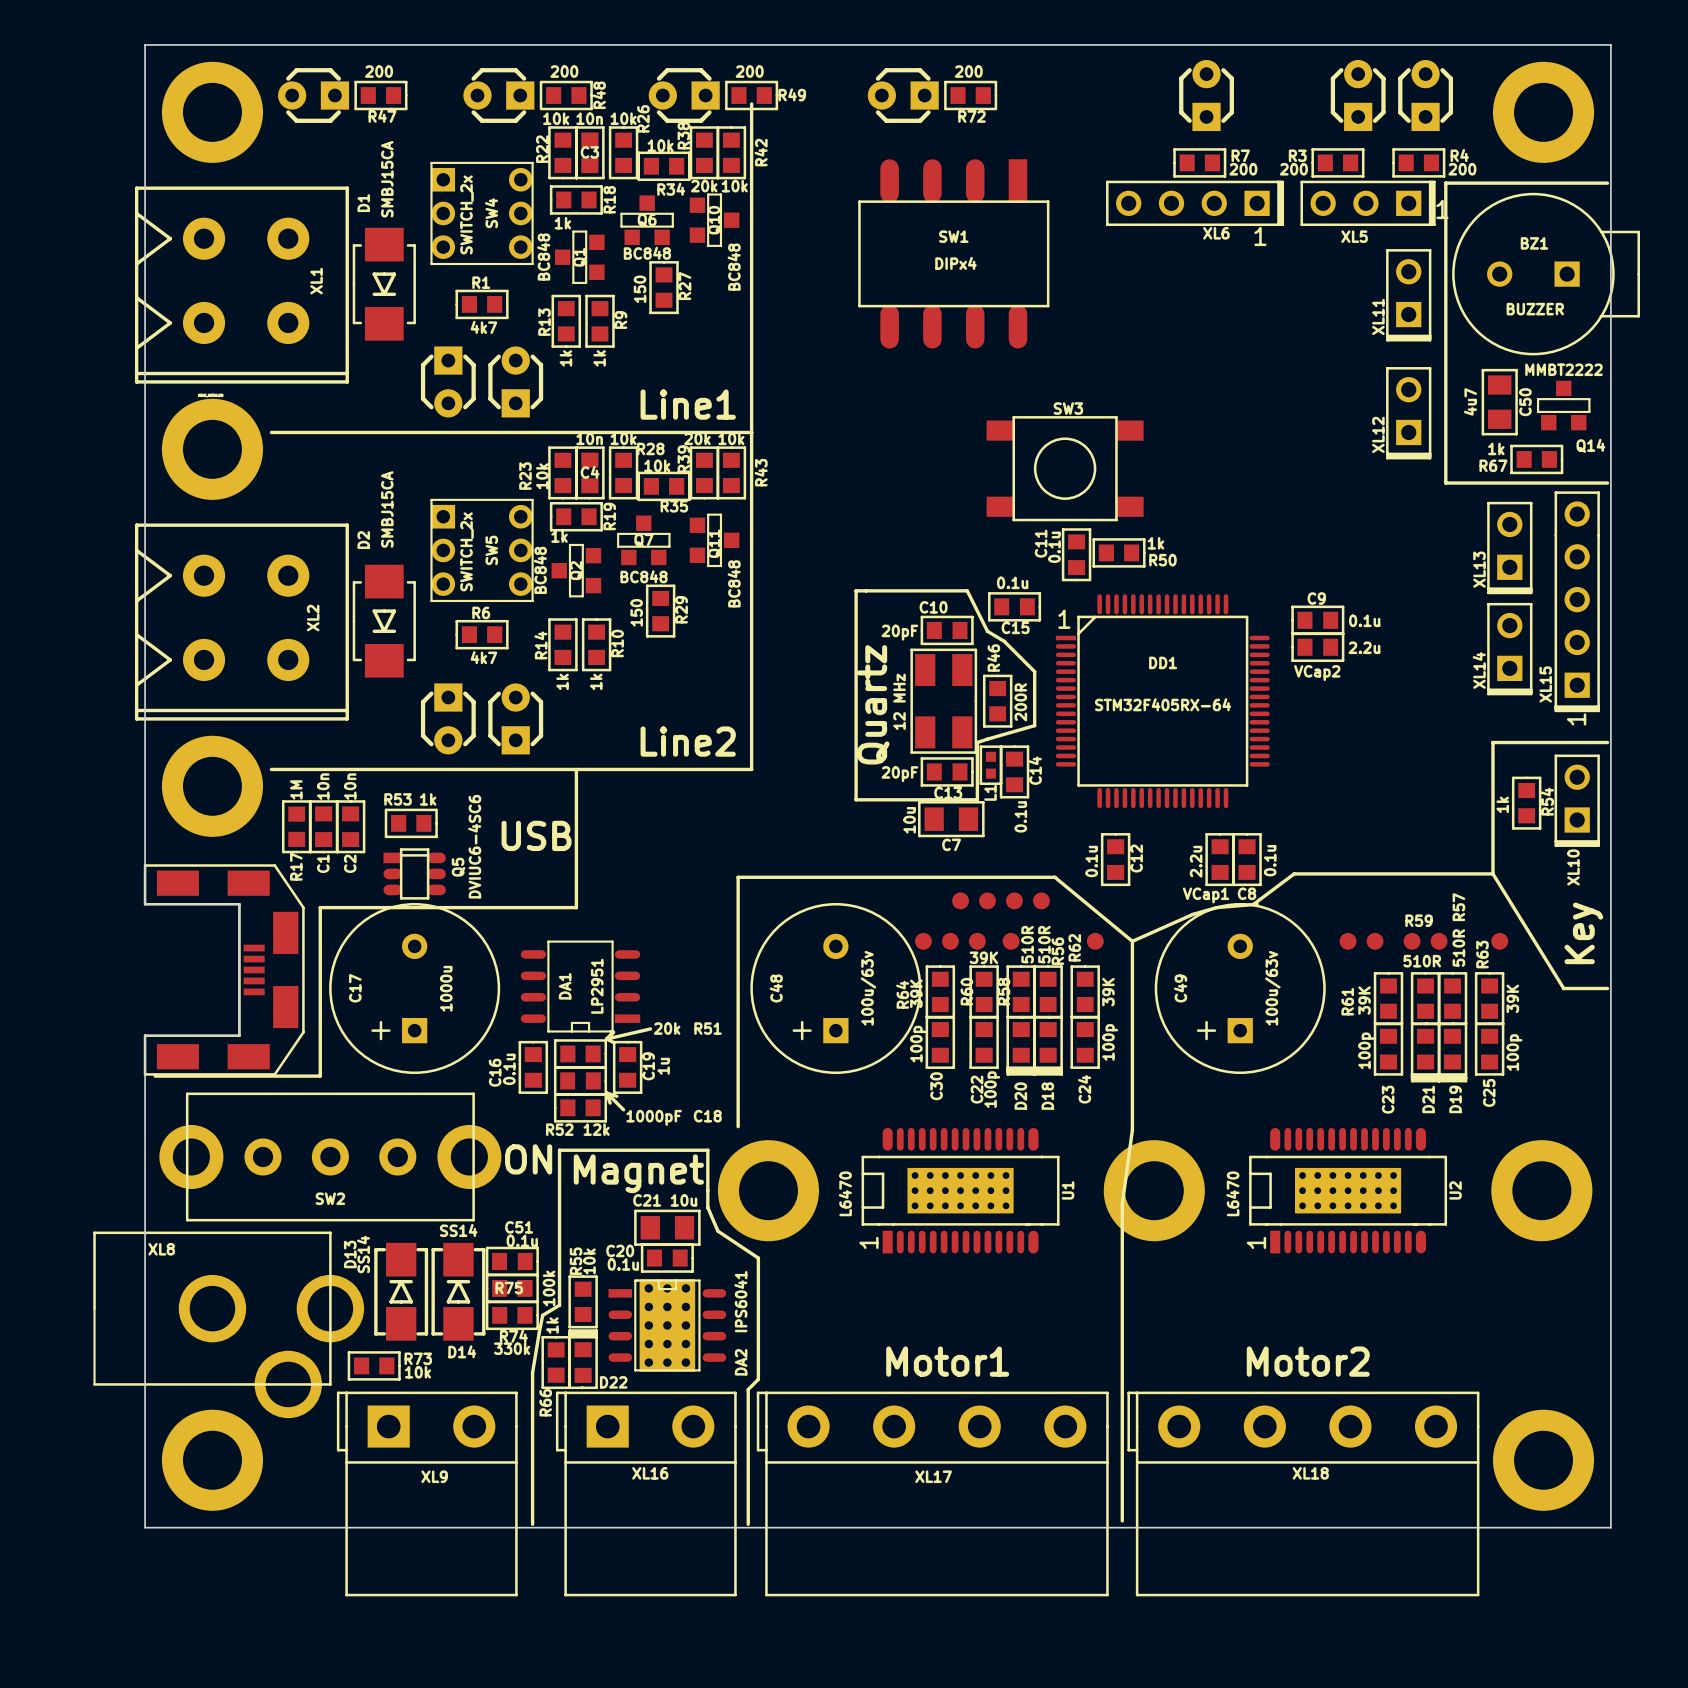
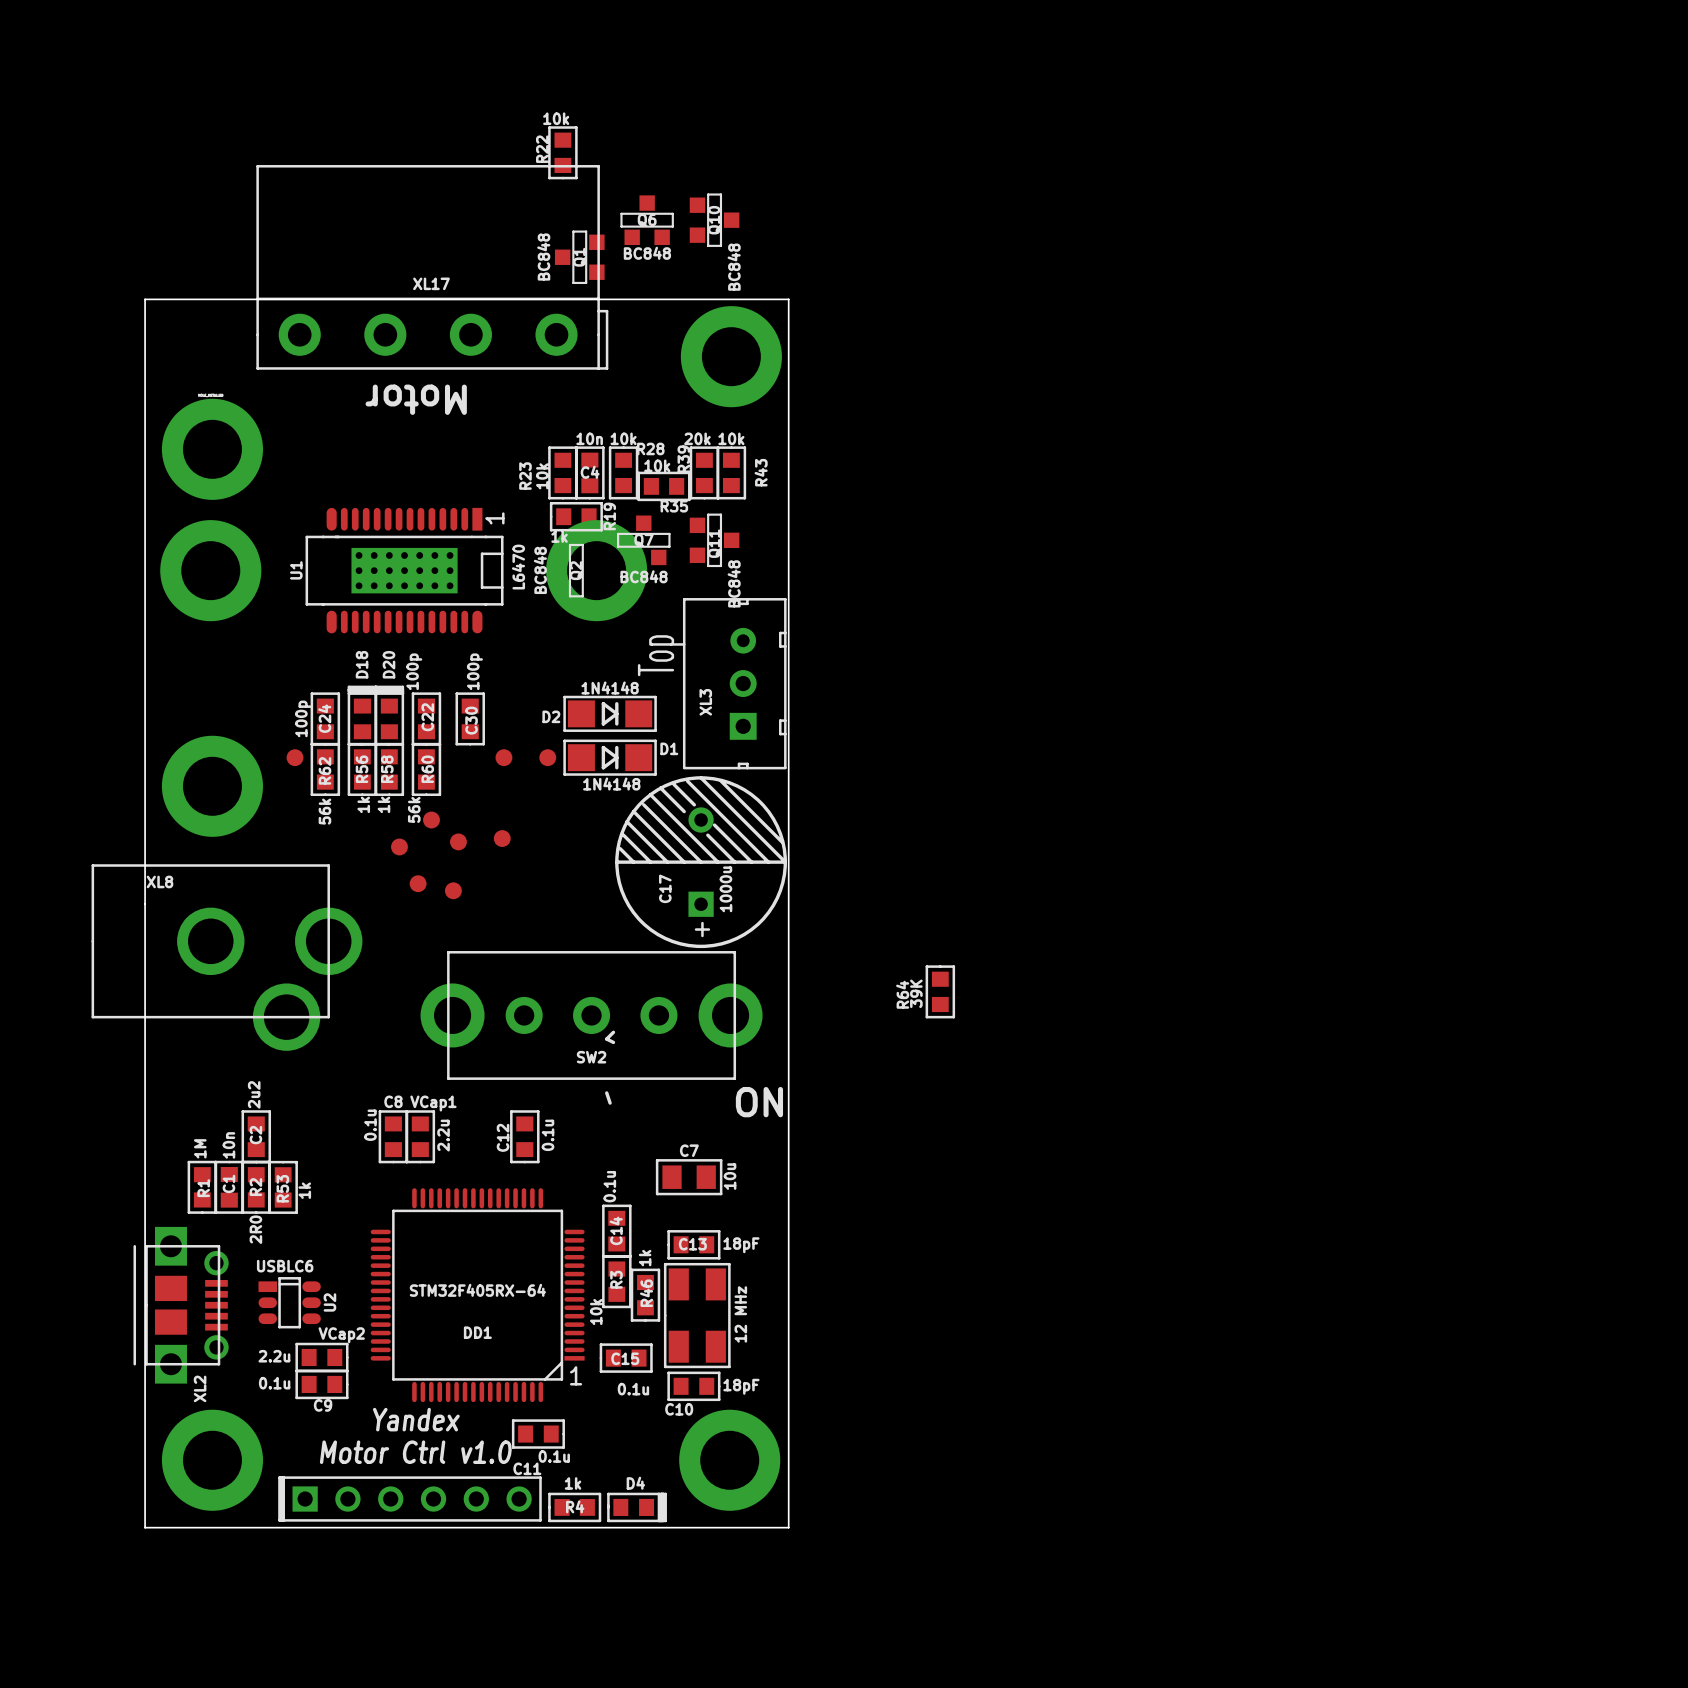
part: (313, 95) -> none
R47: 200 (380, 95) -> none
part: (498, 95) -> none
R48: 200 (566, 95) -> none
part: (684, 95) -> none
R49: 200 (751, 95) -> none
part: (903, 95) -> none
R72: 200 (970, 95) -> none
part: (1206, 95) -> none
part: (1358, 95) -> none
part: (1425, 95) -> none
line: (751, 103) (751, 769) (271, 769) -> none
part: (212, 112) -> none
part: (1543, 112) -> none
C3: 10n (589, 152) -> none
R26: 10k (623, 152) -> none
R38: 20k (704, 152) -> none
R42: 10k (731, 152) -> none
R3 name position: R3 (1297, 155) -> R3 (616, 1279)
R4 name position: R4 (1459, 155) -> R4 (575, 1506)
R7: 200 (1199, 162) -> none
R3 rotation: 0° (1337, 162) -> 90° clockwise (616, 1281)
R3 position: (1337, 162) -> (616, 1281)
R4 position: (1418, 162) -> (574, 1507)
R34: 10k (664, 166) -> none
R3 value: 200 (1293, 169) -> 10k (596, 1312)
R4 value: 200 (1462, 169) -> 1k (573, 1483)
D1 value: SMBJ15CA (387, 179) -> 1N4148 (611, 784)
line: (1607, 183) (1445, 183) (1445, 483) (1607, 483) -> none
R18: 1k (576, 199) -> none
D1 name position: D1 (363, 203) -> D1 (669, 748)
XL6: (1195, 203) -> none
XL5: (1368, 203) -> none
SW4: SWITCH_2x (482, 213) -> none
D1 footprint: [352, 227, 416, 341] -> [563, 739, 657, 776]
SW1: DIPx4 (953, 253) -> none
BZ1: BUZZER (1546, 274) -> none
XL1: (241, 285) -> none
R27: 150 (664, 287) -> none
XL11: (1408, 295) -> none
board edge: (145, 299) (145, 44) (1610, 44) (1610, 1527) (788, 1527) -> (145, 299) (788, 299) (788, 1527)
R1 rotation: 0° (482, 304) -> 90° counterclockwise (202, 1187)
R1 position: (482, 304) -> (202, 1187)
R13: 1k (566, 321) -> none
R9: 1k (599, 321) -> none
R1 value: 4k7 (483, 327) -> 1M (200, 1148)
part: none -> (731, 356)
part: (448, 381) -> none
part: (515, 381) -> none
text: none -> Motor (416, 399)
C50: 4u7 (1499, 402) -> none
text: Line1 (688, 404) -> none
Q14: MMBT2222 (1563, 405) -> none
XL12: (1408, 413) -> none
line: (271, 432) (751, 432) -> none
R67: 1k (1536, 459) -> none
SW3: (1065, 468) -> none
D2 value: SMBJ15CA (387, 509) -> 1N4148 (610, 687)
XL2 footprint: [134, 523, 349, 721] -> [133, 1226, 229, 1384]
D2 name position: D2 (363, 540) -> D2 (551, 716)
XL13: (1509, 548) -> none
SW5: SWITCH_2x (482, 550) -> none
R50: 1k (1119, 552) -> none
C11 rotation: 0° (1076, 554) -> 90° counterclockwise (538, 1434)
C11 position: (1076, 554) -> (538, 1434)
D2 footprint: [352, 564, 416, 678] -> [563, 695, 657, 732]
part: none -> (210, 570)
part: none -> (596, 570)
line: (856, 590) (967, 590) (987, 631) (1004, 641) (1034, 671) (1034, 725) (977, 742) (977, 799) (856, 799) (856, 590) -> none
XL15: (1577, 601) -> none
C15 rotation: 0° (1014, 606) -> 180° (626, 1358)
C15 position: (1014, 606) -> (626, 1358)
R29: 150 (660, 611) -> none
XL2 name position: XL2 (313, 618) -> XL2 (200, 1388)
C9 rotation: 0° (1317, 620) -> 180° (321, 1384)
C9 position: (1317, 620) -> (321, 1384)
C10 rotation: 0° (947, 630) -> 180° (693, 1386)
C10 position: (947, 630) -> (693, 1386)
C10 value: 20pF (899, 632) -> 18pF (741, 1386)
R6: 4k7 (482, 634) -> none
R14: 1k (562, 644) -> none
R10: 1k (596, 644) -> none
VCap2 rotation: 0° (1317, 647) -> 180° (321, 1357)
VCap2 position: (1317, 647) -> (321, 1357)
XL14: (1509, 649) -> none
text: none -> Top (661, 655)
R46 name position: R46 (993, 658) -> R46 (646, 1293)
XL3: none -> (734, 683)
part: 12 MHz (943, 701) -> none
R46 rotation: 0° (997, 701) -> 180° (645, 1295)
R46 position: (997, 701) -> (645, 1295)
DD1 rotation: 0° (1162, 701) -> 180° (477, 1295)
DD1 position: (1162, 701) -> (477, 1295)
R46 value: 200R (1020, 702) -> 1k (645, 1258)
text: Quartz (873, 704) -> none
part: (448, 718) -> none
part: (515, 718) -> none
text: Line2 (688, 741) -> none
line: (1607, 742) (1492, 742) (1492, 873) -> none
part: none -> (295, 757)
part: none -> (503, 757)
part: none -> (547, 757)
L1: (990, 765) -> none
line: (576, 769) (576, 907) (320, 907) (320, 1076) (155, 1076) -> none
C13 rotation: 0° (947, 771) -> 180° (693, 1244)
C13 position: (947, 771) -> (693, 1244)
C14 rotation: 0° (1014, 771) -> 180° (616, 1231)
C14 position: (1014, 771) -> (616, 1231)
C13 value: 20pF (899, 774) -> 18pF (741, 1245)
C2 value: 10n (350, 786) -> 2u2 (254, 1094)
XL10: (1577, 800) -> none
R54: 1k (1526, 803) -> none
C7 position: (951, 819) -> (689, 1177)
part: none -> (431, 820)
C7 value position: 10u (909, 820) -> 10u (730, 1176)
R53 rotation: 0° (411, 823) -> 90° counterclockwise (283, 1187)
R53 position: (411, 823) -> (283, 1187)
R17: 1M (296, 826) -> none
C1 rotation: 0° (323, 826) -> 180° (229, 1187)
C1 position: (323, 826) -> (229, 1187)
C2 rotation: 0° (350, 826) -> 180° (256, 1136)
C2 position: (350, 826) -> (256, 1136)
text: USB (536, 835) -> none
part: none -> (502, 838)
part: none -> (458, 841)
C7 name position: C7 (951, 844) -> C7 (689, 1150)
part: none -> (399, 846)
C12 rotation: 0° (1115, 859) -> 180° (524, 1136)
C12 position: (1115, 859) -> (524, 1136)
VCap1 rotation: 0° (1220, 859) -> 180° (420, 1136)
VCap1 position: (1220, 859) -> (420, 1136)
C8 rotation: 0° (1247, 859) -> 180° (393, 1136)
C8 position: (1247, 859) -> (393, 1136)
C1 name position: C1 (323, 863) -> C1 (228, 1183)
C2 name position: C2 (350, 863) -> C2 (255, 1135)
Q5: DVIUC6-4SC6 (414, 873) -> none
line: (1492, 873) (1294, 873) (1253, 904) -> none
line: (1492, 873) (1563, 988) (1607, 988) -> none
part: none -> (418, 883)
part: none -> (453, 890)
part: (960, 900) -> none
part: (987, 900) -> none
part: (1014, 900) -> none
part: (1041, 900) -> none
C17 footprint: [329, 902, 501, 1075] -> [615, 776, 788, 949]
board edge: (145, 904) (239, 904) (239, 1035) (145, 1035) -> (145, 904) (145, 1035)
line: (1257, 904) (1216, 907) (1193, 914) (1132, 941) -> none
text: Key (1583, 933) -> none
part: (923, 941) -> none
part: (950, 941) -> none
part: (977, 941) -> none
part: (1011, 941) -> none
part: (1095, 941) -> none
line: (1132, 941) (1132, 1130) (1122, 1204) (1122, 1520) -> none
line: (1132, 941) (1054, 877) (738, 877) (738, 1126) -> none
part: (1348, 941) -> none
part: (1375, 941) -> none
part: (1412, 941) -> none
part: (1439, 941) -> none
part: (1499, 941) -> none
R58 value: 510R (1027, 944) -> 1k (383, 804)
R56 value: 510R (1044, 944) -> 1k (363, 804)
R62 name position: R62 (1074, 947) -> R62 (324, 770)
R56 name position: R56 (1057, 951) -> R56 (362, 769)
R60 value: 39K (983, 957) -> 56k (414, 809)
part: (224, 969) -> none
DA1: LP2951 (580, 986) -> none
C17 name position: C17 (355, 988) -> C17 (665, 888)
C48: 100u/63v (835, 988) -> none
C49: 100u/63v (1240, 988) -> none
R60 rotation: 0° (984, 991) -> 180° (426, 769)
R60 position: (984, 991) -> (426, 769)
R58 rotation: 0° (1021, 991) -> 180° (389, 769)
R58 position: (1021, 991) -> (389, 769)
R56 rotation: 0° (1048, 991) -> 180° (362, 769)
R56 position: (1048, 991) -> (362, 769)
R62 rotation: 0° (1085, 991) -> 180° (325, 769)
R62 position: (1085, 991) -> (325, 769)
R62 value: 39K (1108, 992) -> 56k (324, 811)
R61: 39K (1388, 998) -> none
R59: 510R (1425, 998) -> none
R57: 510R (1452, 998) -> none
R63: 39K (1489, 998) -> none
line: (650, 1028) (606, 1039) -> none
C30 rotation: 0° (940, 1042) -> 180° (470, 718)
C30 position: (940, 1042) -> (470, 718)
C22 rotation: 0° (984, 1042) -> 180° (426, 718)
C22 position: (984, 1042) -> (426, 718)
C24 rotation: 0° (1085, 1042) -> 180° (325, 718)
C24 position: (1085, 1042) -> (325, 718)
C30 value position: 100p (918, 1044) -> 100p (474, 671)
D20 rotation: 0° (1021, 1045) -> 180° (389, 715)
D20 position: (1021, 1045) -> (389, 715)
D18 rotation: 0° (1048, 1045) -> 180° (362, 715)
D18 position: (1048, 1045) -> (362, 715)
C23: 100p (1388, 1049) -> none
C25: 100p (1489, 1049) -> none
D21: (1425, 1052) -> none
D19: (1452, 1052) -> none
R51: 20k (580, 1053) -> none
C16: 0.1u (533, 1067) -> none
C19: 1u (627, 1067) -> none
C18: 1000pF (580, 1080) -> none
C30 name position: C30 (936, 1086) -> C30 (471, 720)
C22 name position: C22 (977, 1089) -> C22 (427, 717)
C24 name position: C24 (1084, 1089) -> C24 (324, 718)
line: (616, 1096) (606, 1092) (623, 1109) -> none
R52: 12k (580, 1107) -> none
U2 footprint: [1249, 1127, 1448, 1254] -> [258, 1277, 321, 1329]
SW2 position: (330, 1156) -> (591, 1015)
text position: ON (528, 1159) -> ON (759, 1102)
text: Magnet (638, 1173) -> none
R2: none -> 2R0 (256, 1187)
part: (768, 1190) -> none
U1 rotation: 0° (960, 1190) -> 180° (404, 570)
U1 position: (960, 1190) -> (404, 570)
part: (1154, 1190) -> none
U2 name position: U2 (1455, 1190) -> U2 (329, 1302)
part: (1541, 1190) -> none
U2 value: L6470 (1232, 1193) -> USBLC6 (285, 1266)
C21: 10u (667, 1227) -> none
XL8 footprint: [93, 1231, 365, 1419] -> [91, 864, 363, 1051]
C20: 0.1u (667, 1258) -> none
C51: 0.1u (512, 1261) -> none
R75: 100k (512, 1288) -> none
D13: SS14 (401, 1291) -> none
D14: SS14 (458, 1291) -> none
R55: 10k (583, 1301) -> none
R74: 330k (512, 1315) -> none
part: none -> 12 MHz (697, 1315)
DA2: IPS6041 (667, 1325) -> none
D22: (583, 1359) -> none
text: Motor1 (947, 1361) -> none
text: Motor2 (1308, 1361) -> none
R66: 1k (556, 1362) -> none
R73: 10k (374, 1365) -> none
text: none -> Yandex (416, 1419)
text: none -> Motor Ctrl v1.0 (415, 1452)
part: none -> (729, 1460)
part: (1543, 1460) -> none
XL9: (427, 1493) -> none
XL16: (646, 1493) -> none
XL17 rotation: 0° (932, 1493) -> 180° (432, 267)
XL17 position: (932, 1493) -> (432, 267)
XL18: (1303, 1493) -> none
part: none -> (409, 1499)
D4: none -> (637, 1507)
line: (532, 1524) (532, 1372) (542, 1315) (559, 1305) (559, 1150) (707, 1150) (707, 1207) (717, 1231) (758, 1258) (758, 1379) (748, 1389) (748, 1524) -> none

